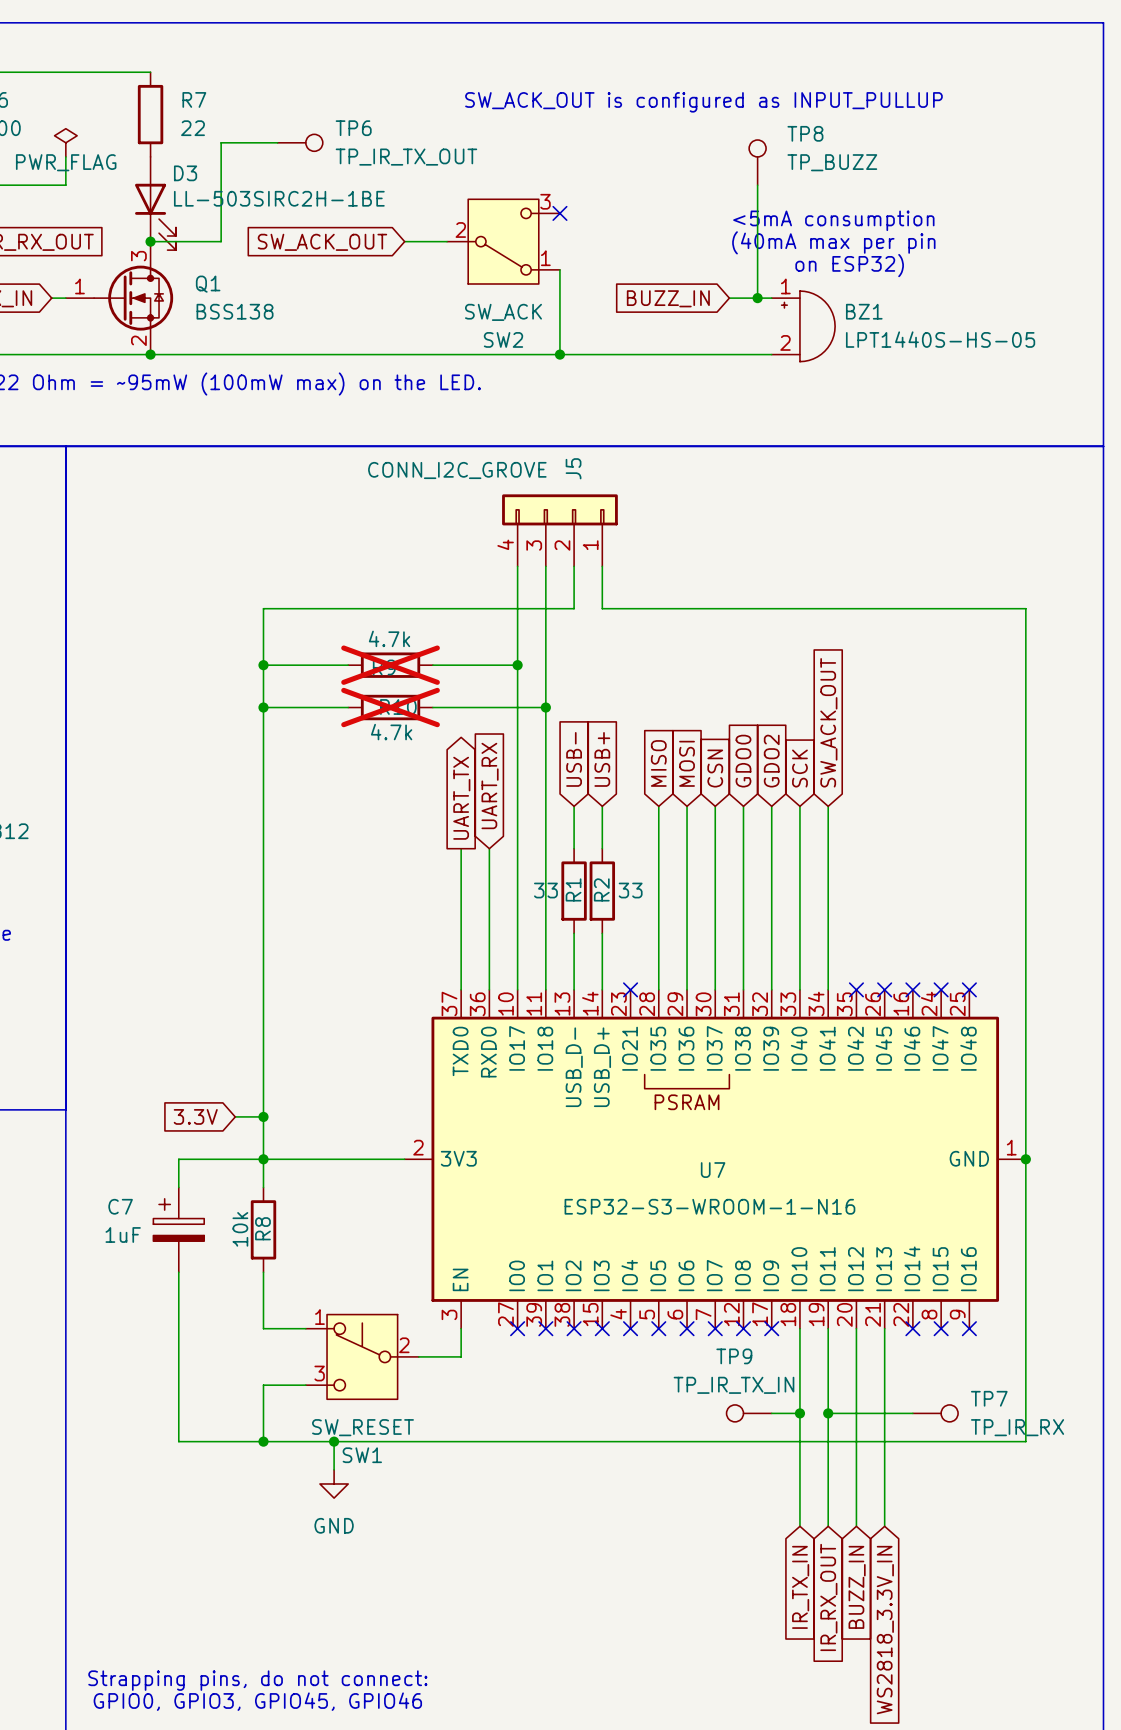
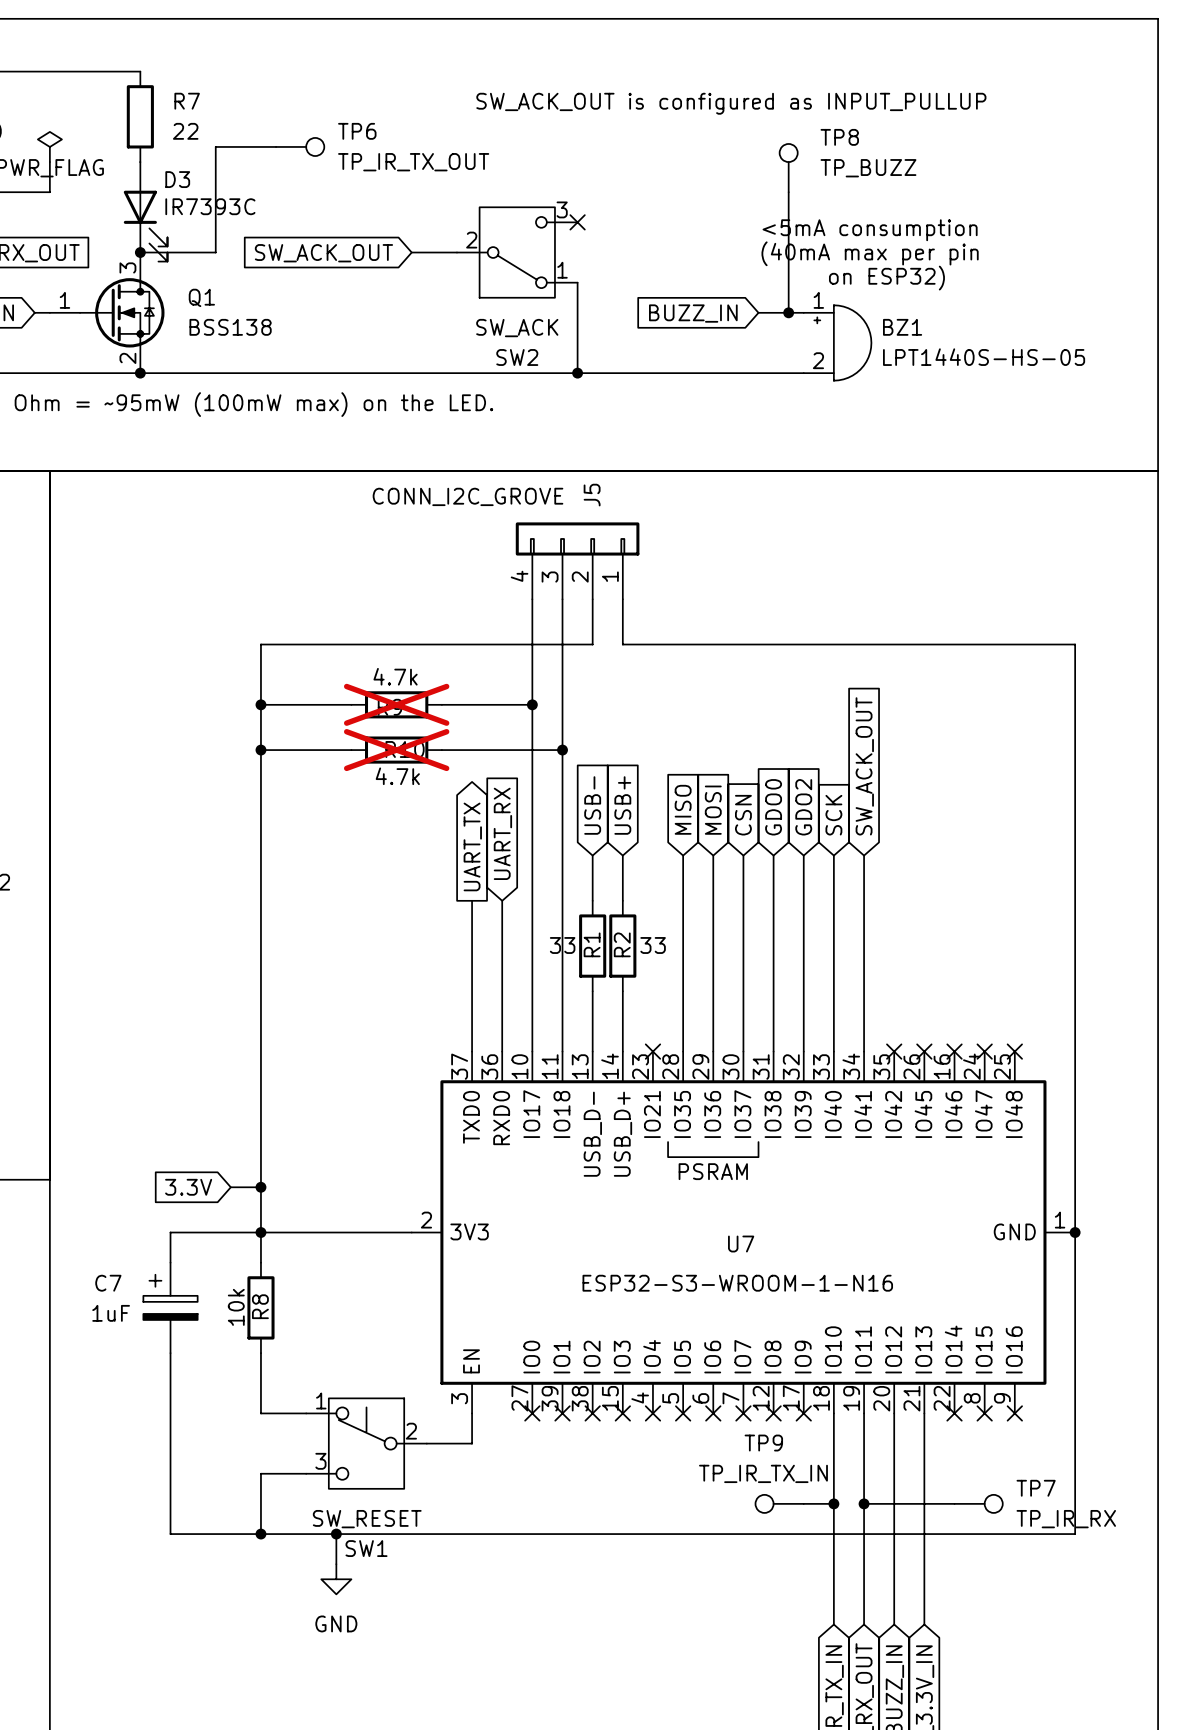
D3 value: LL-503SIRC2H-1BE (279, 198) -> IR7393C (210, 206)

